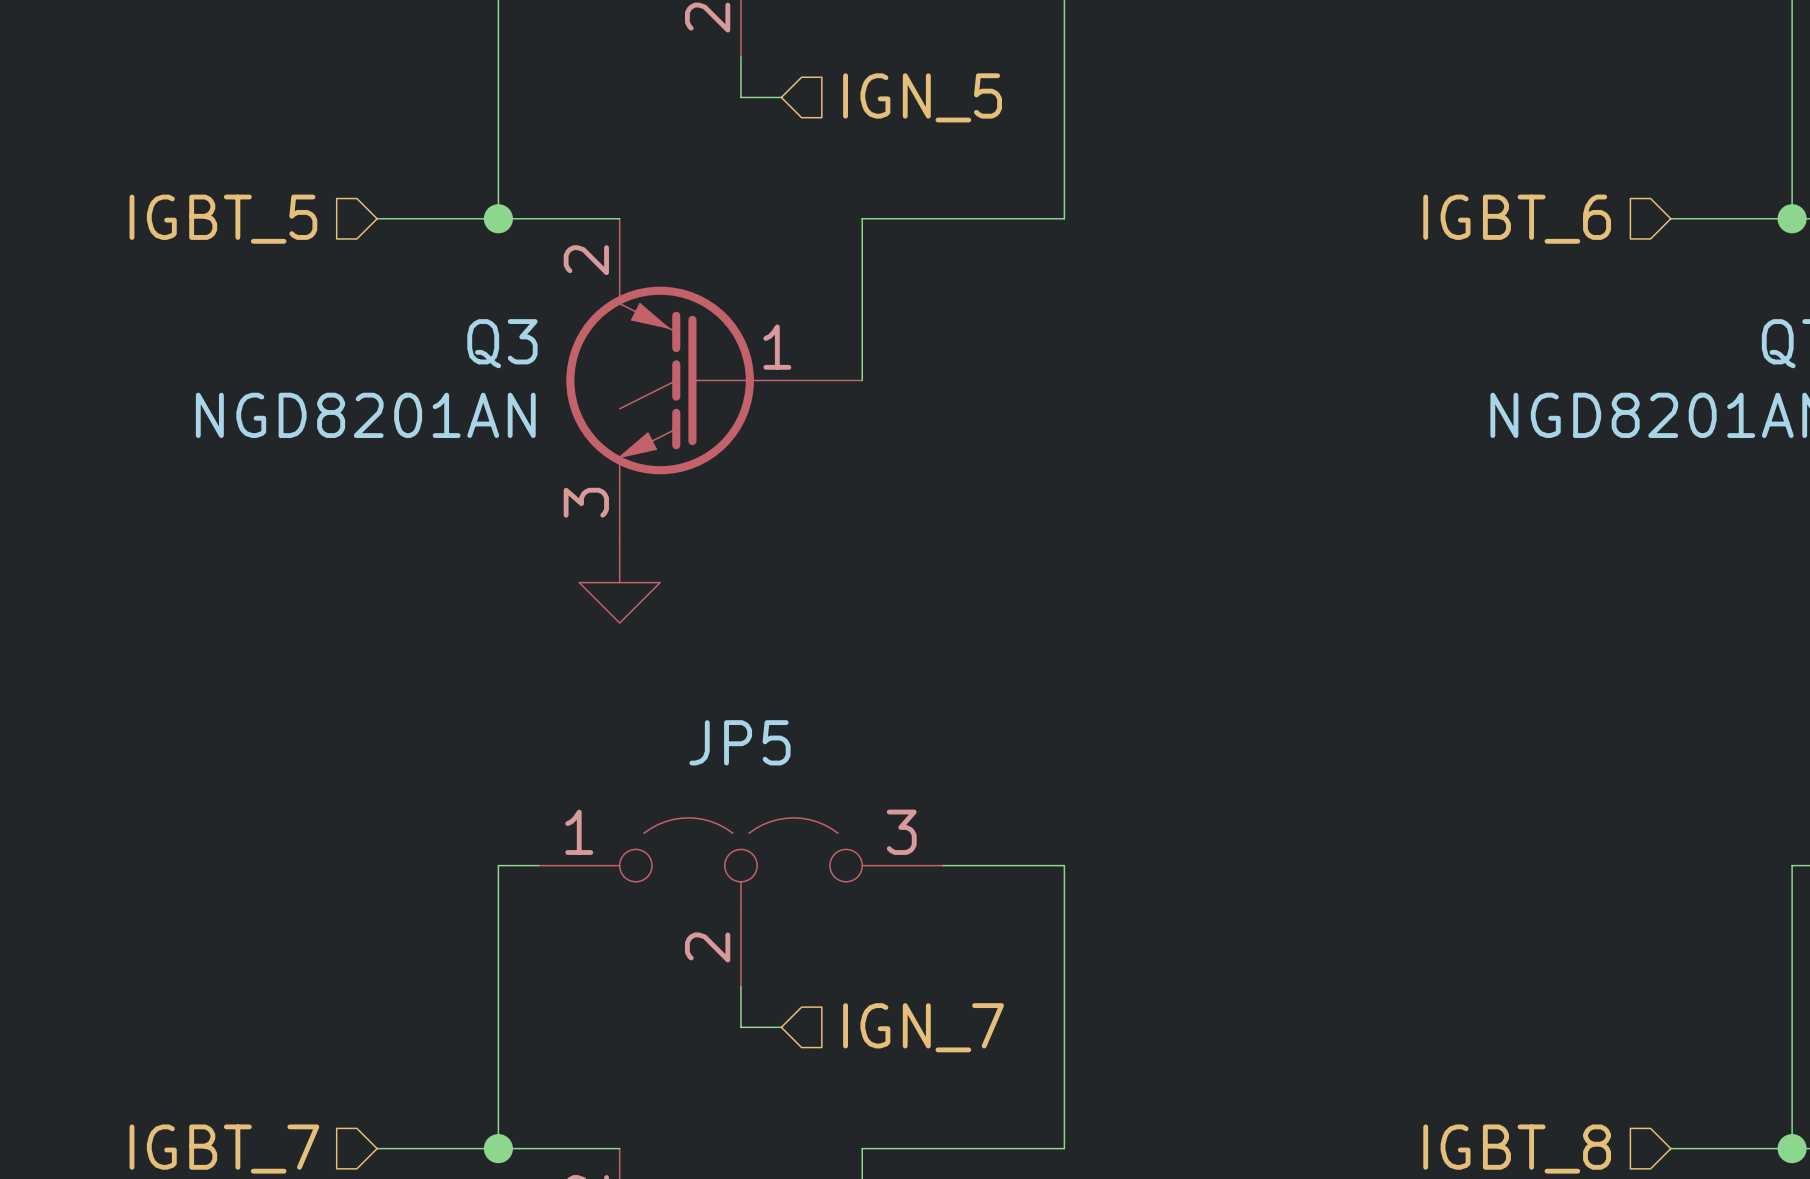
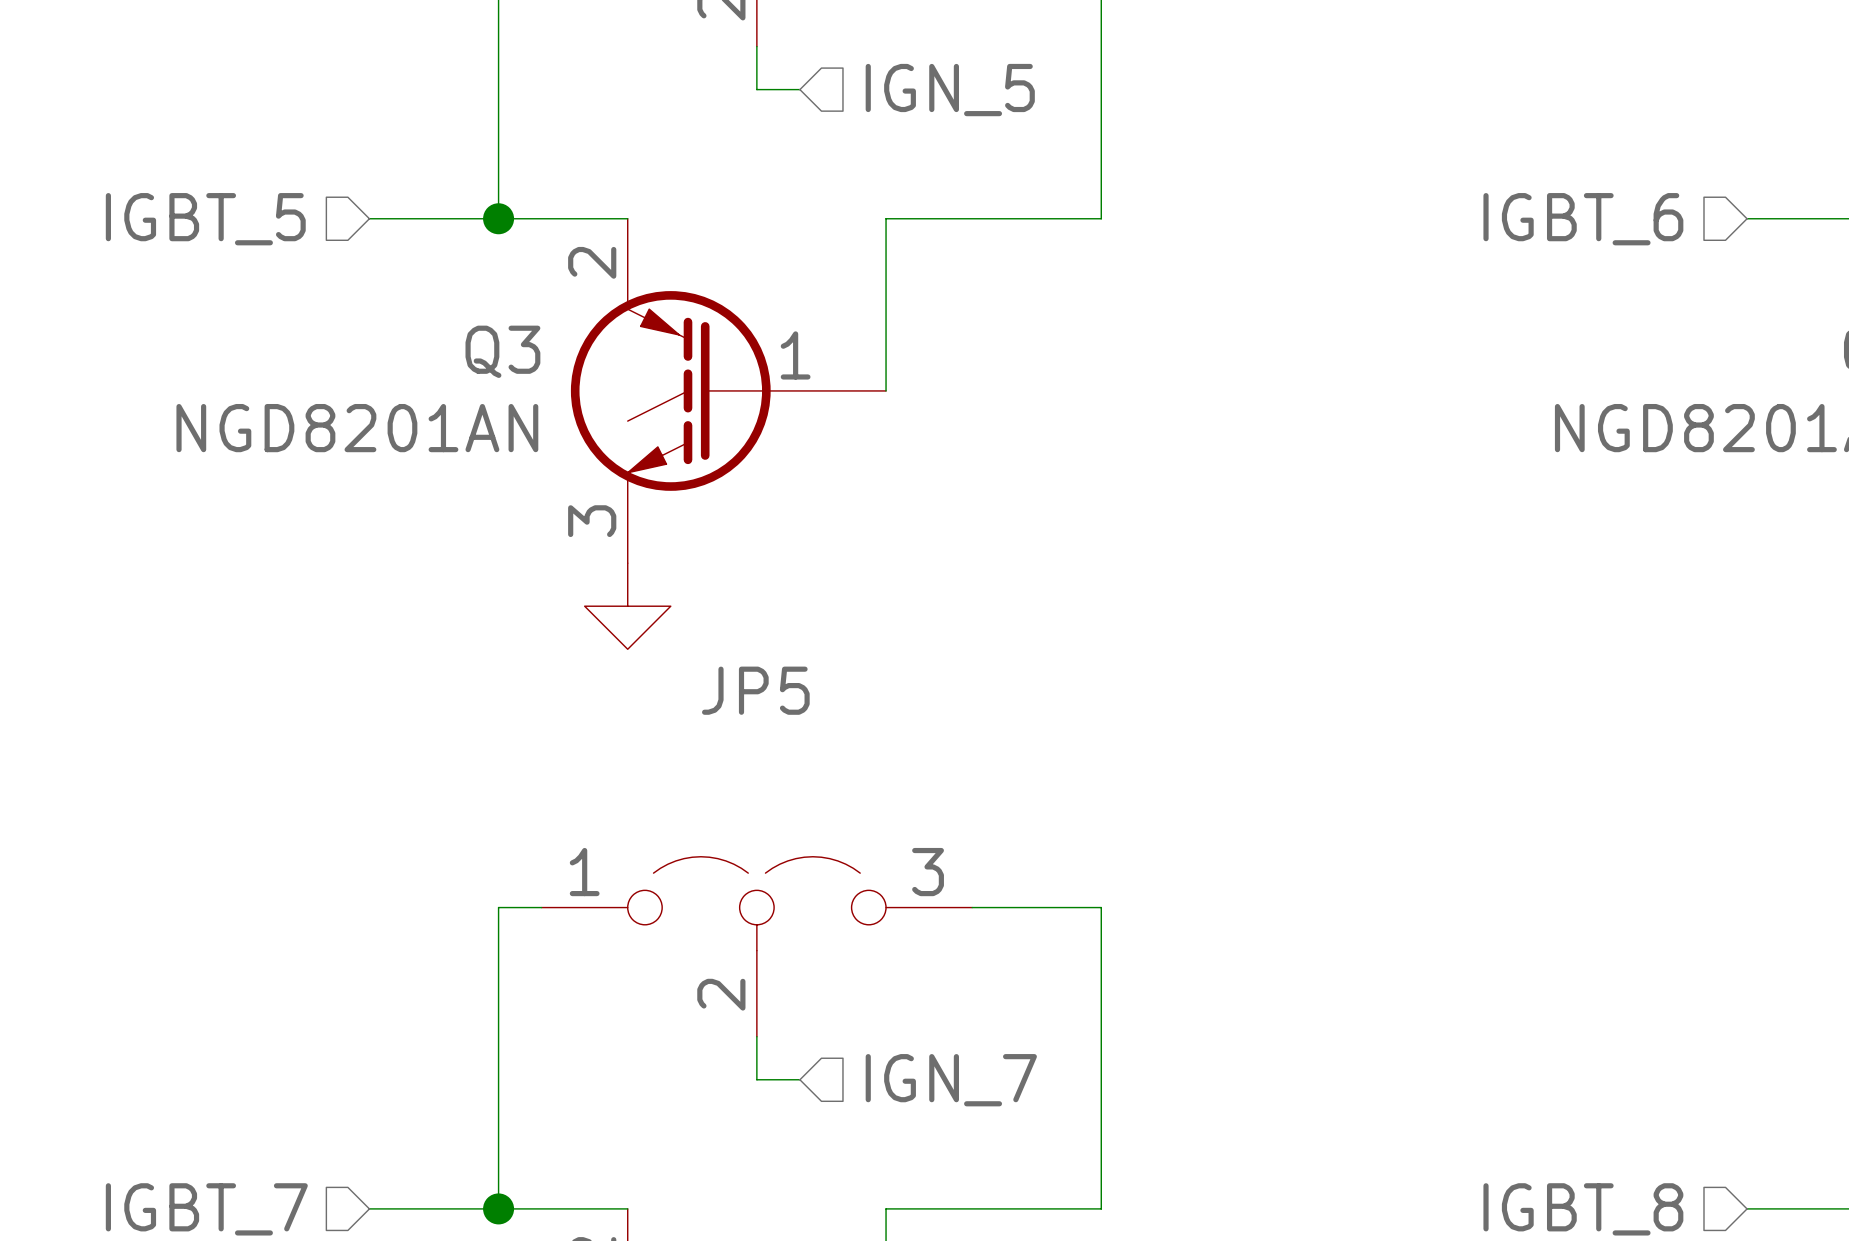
JP5 name position: JP5 (740, 742) -> JP5 (755, 690)

